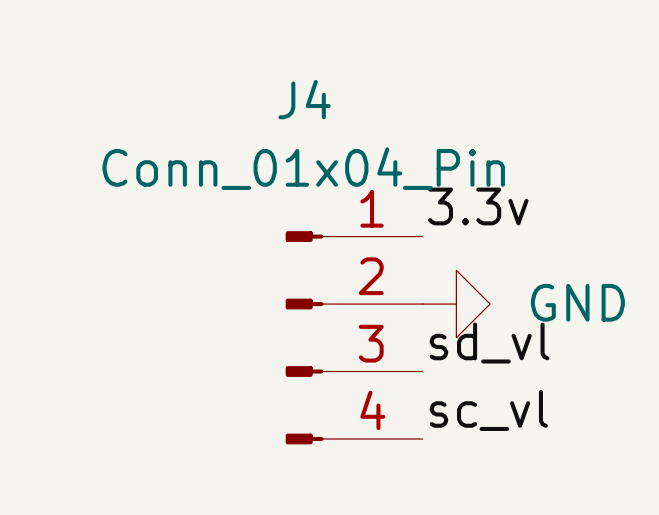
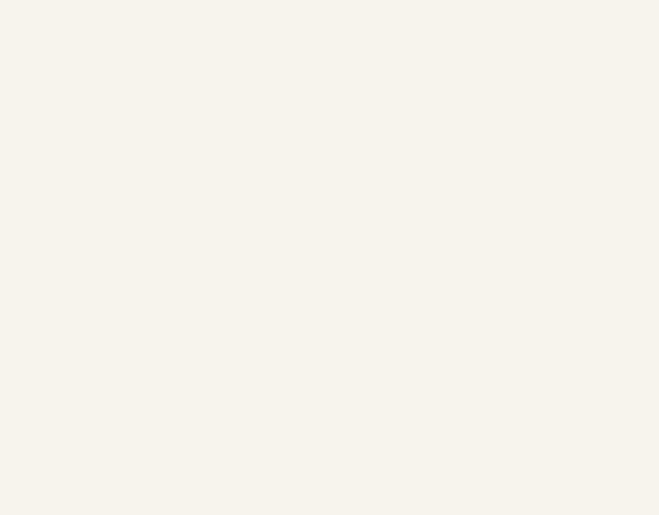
label: 3.3v (478, 206) -> none
power symbol: GND (456, 304) -> none
J4: Conn_01x04_Pin (354, 337) -> none
label: sd_vl (489, 343) -> none
label: sc_vl (488, 410) -> none

